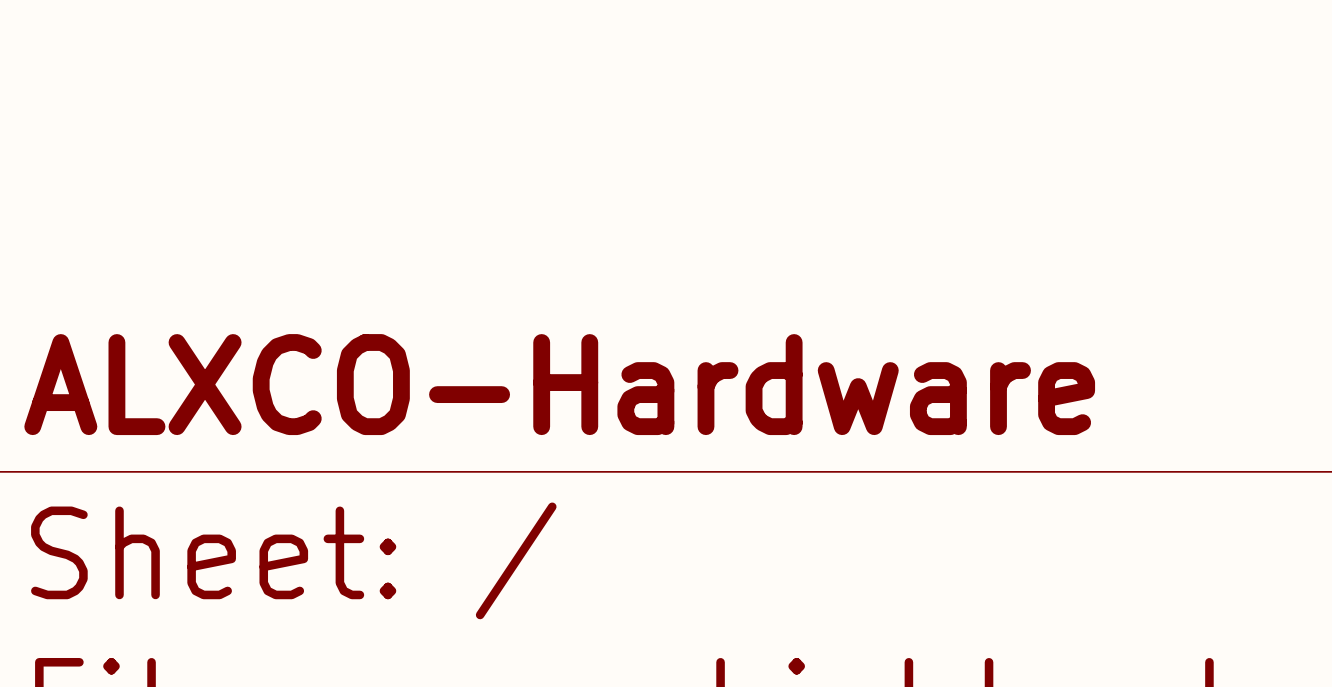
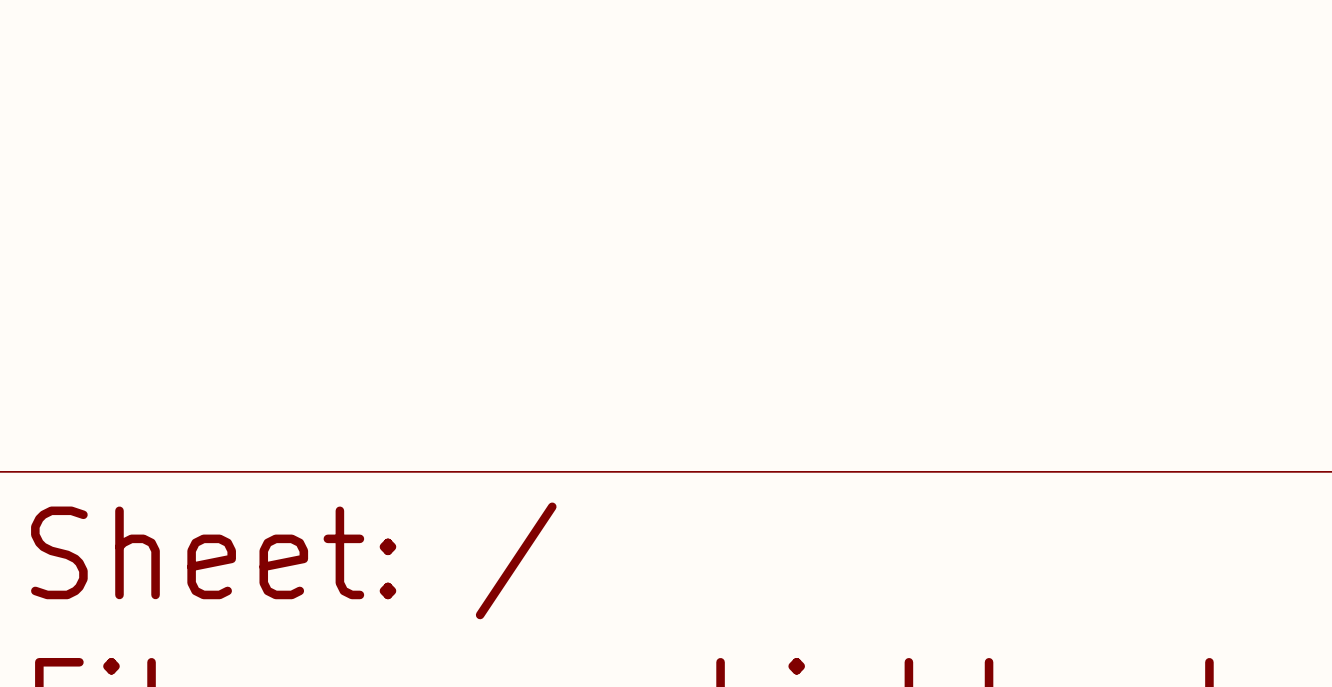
title block: ALXCO-Hardware (559, 384) -> none

